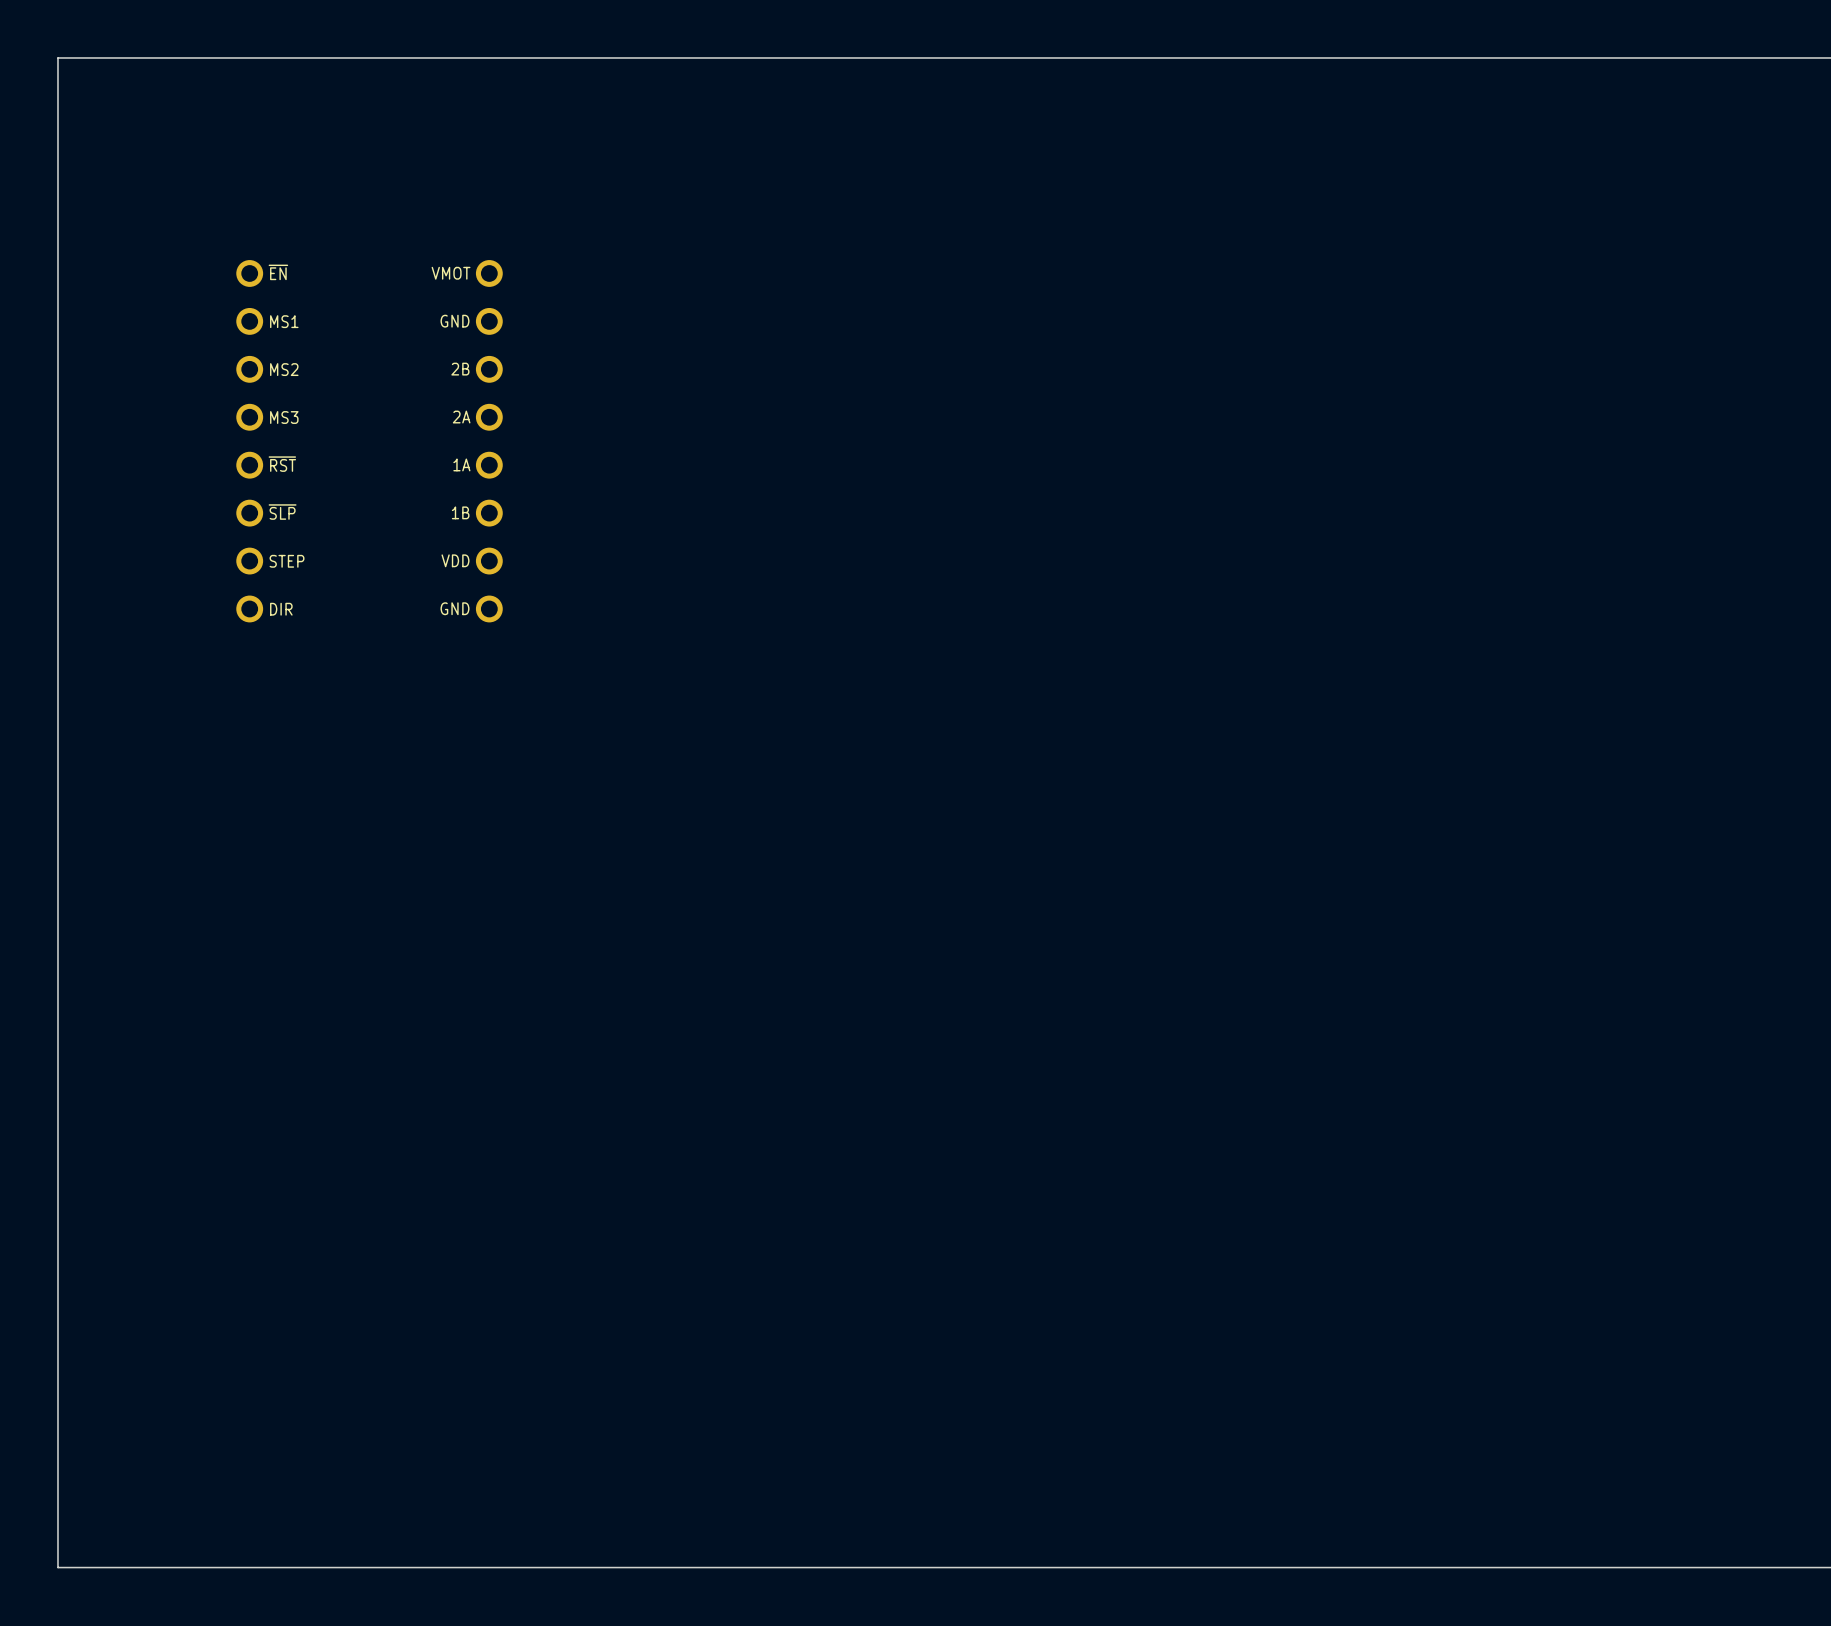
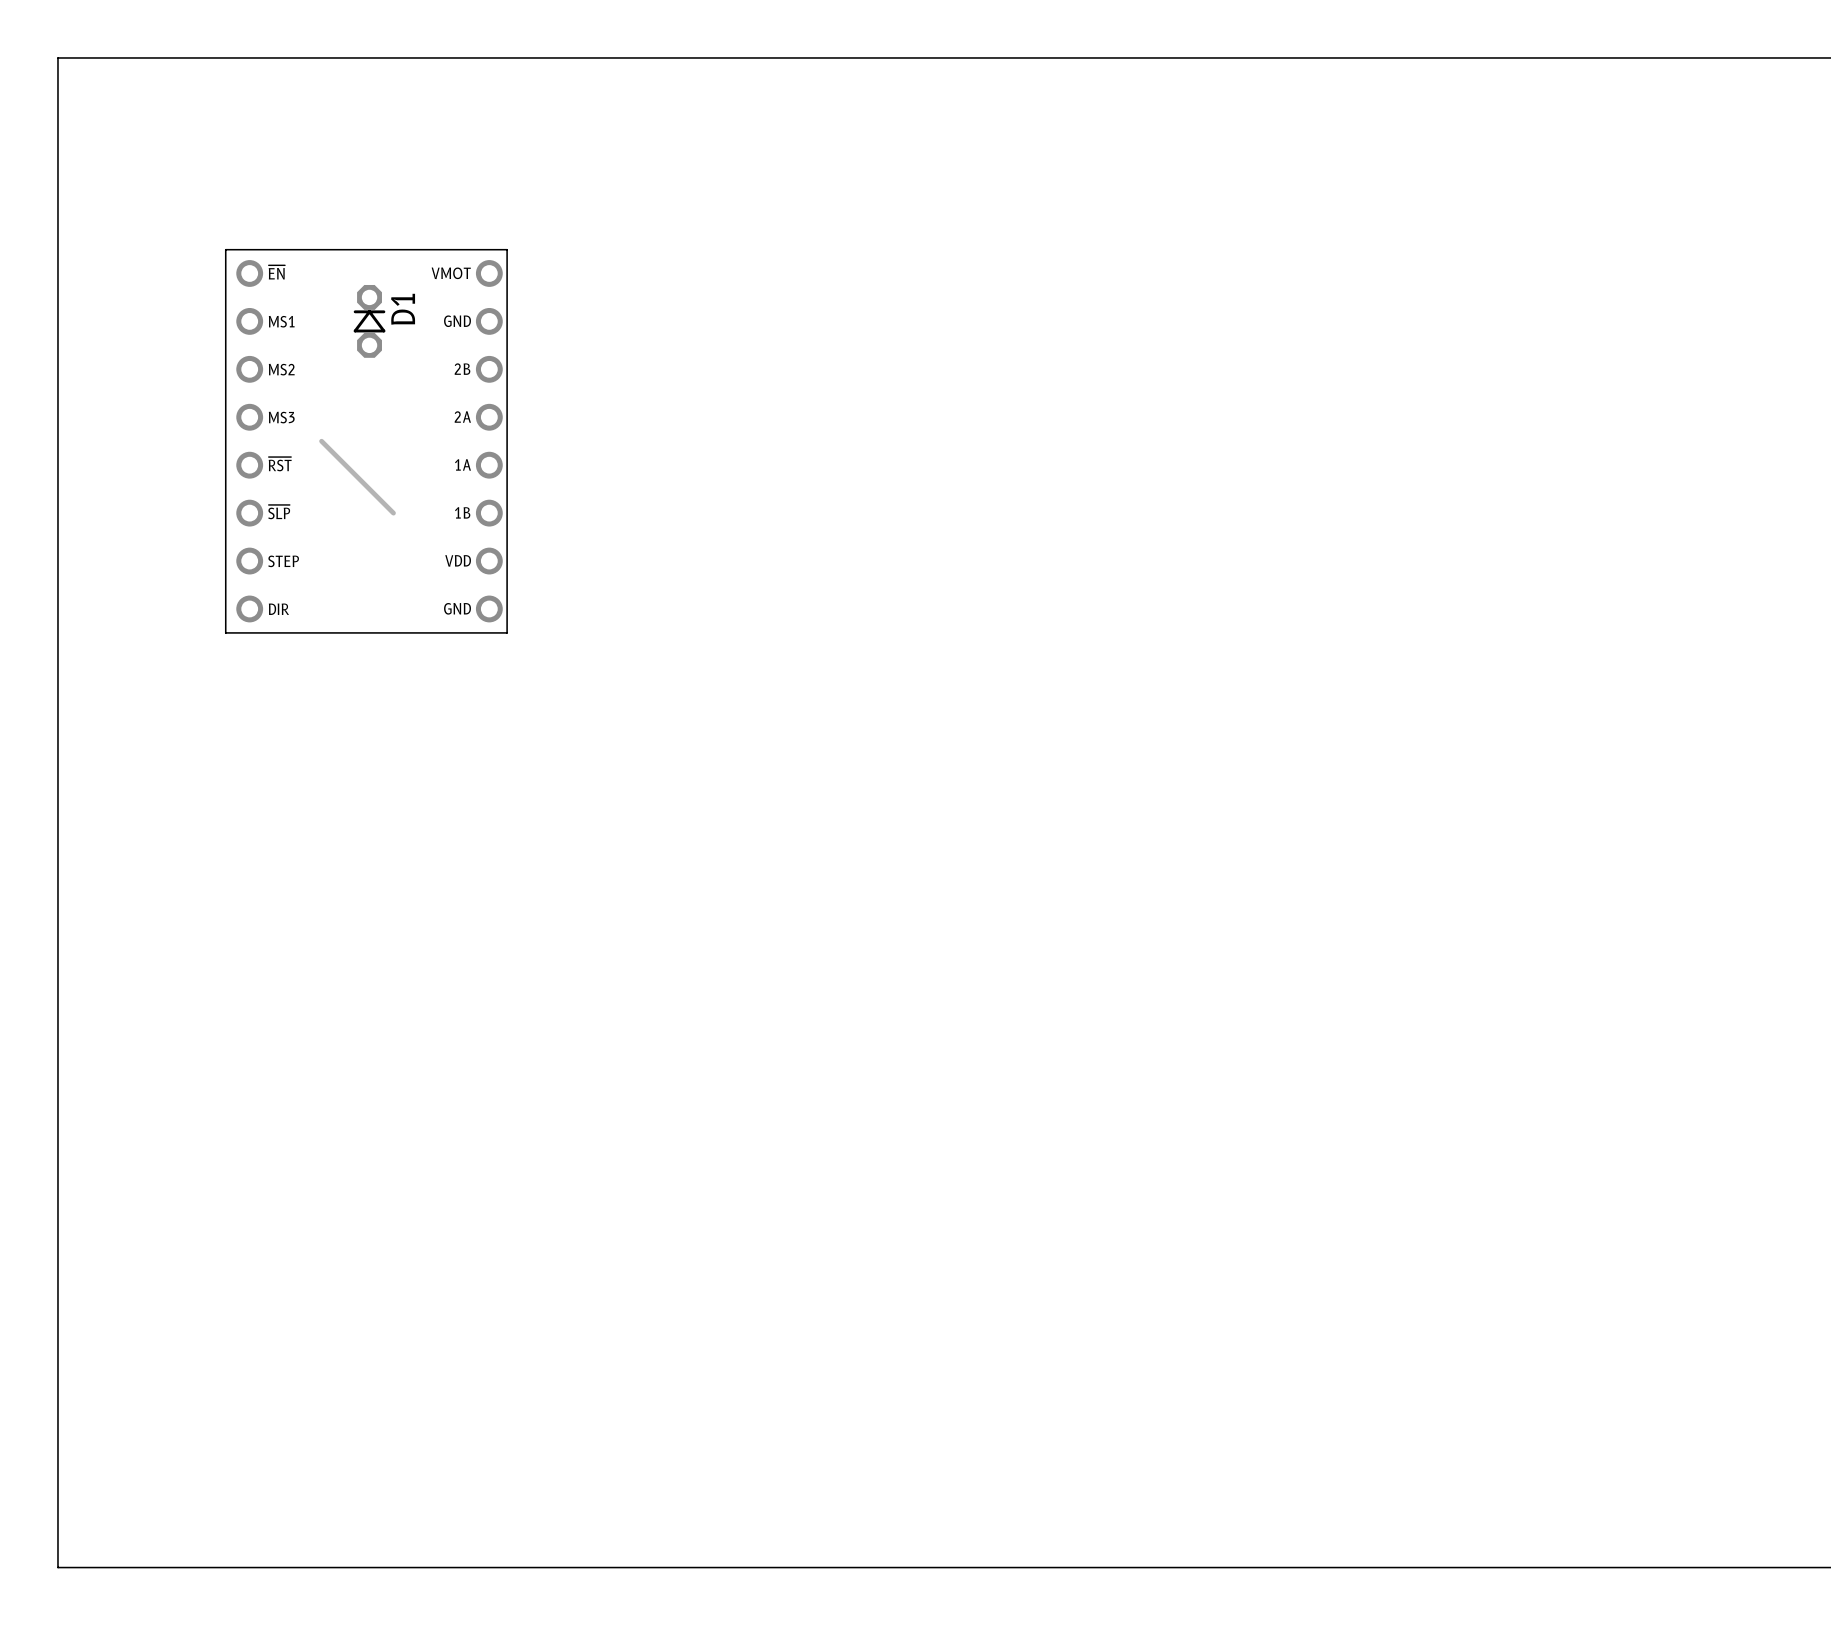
board edge: none -> (225, 249) (507, 249) (507, 632) (225, 632) (225, 249)
D1: none -> (369, 321)
track: none -> (321, 441) (393, 513)

